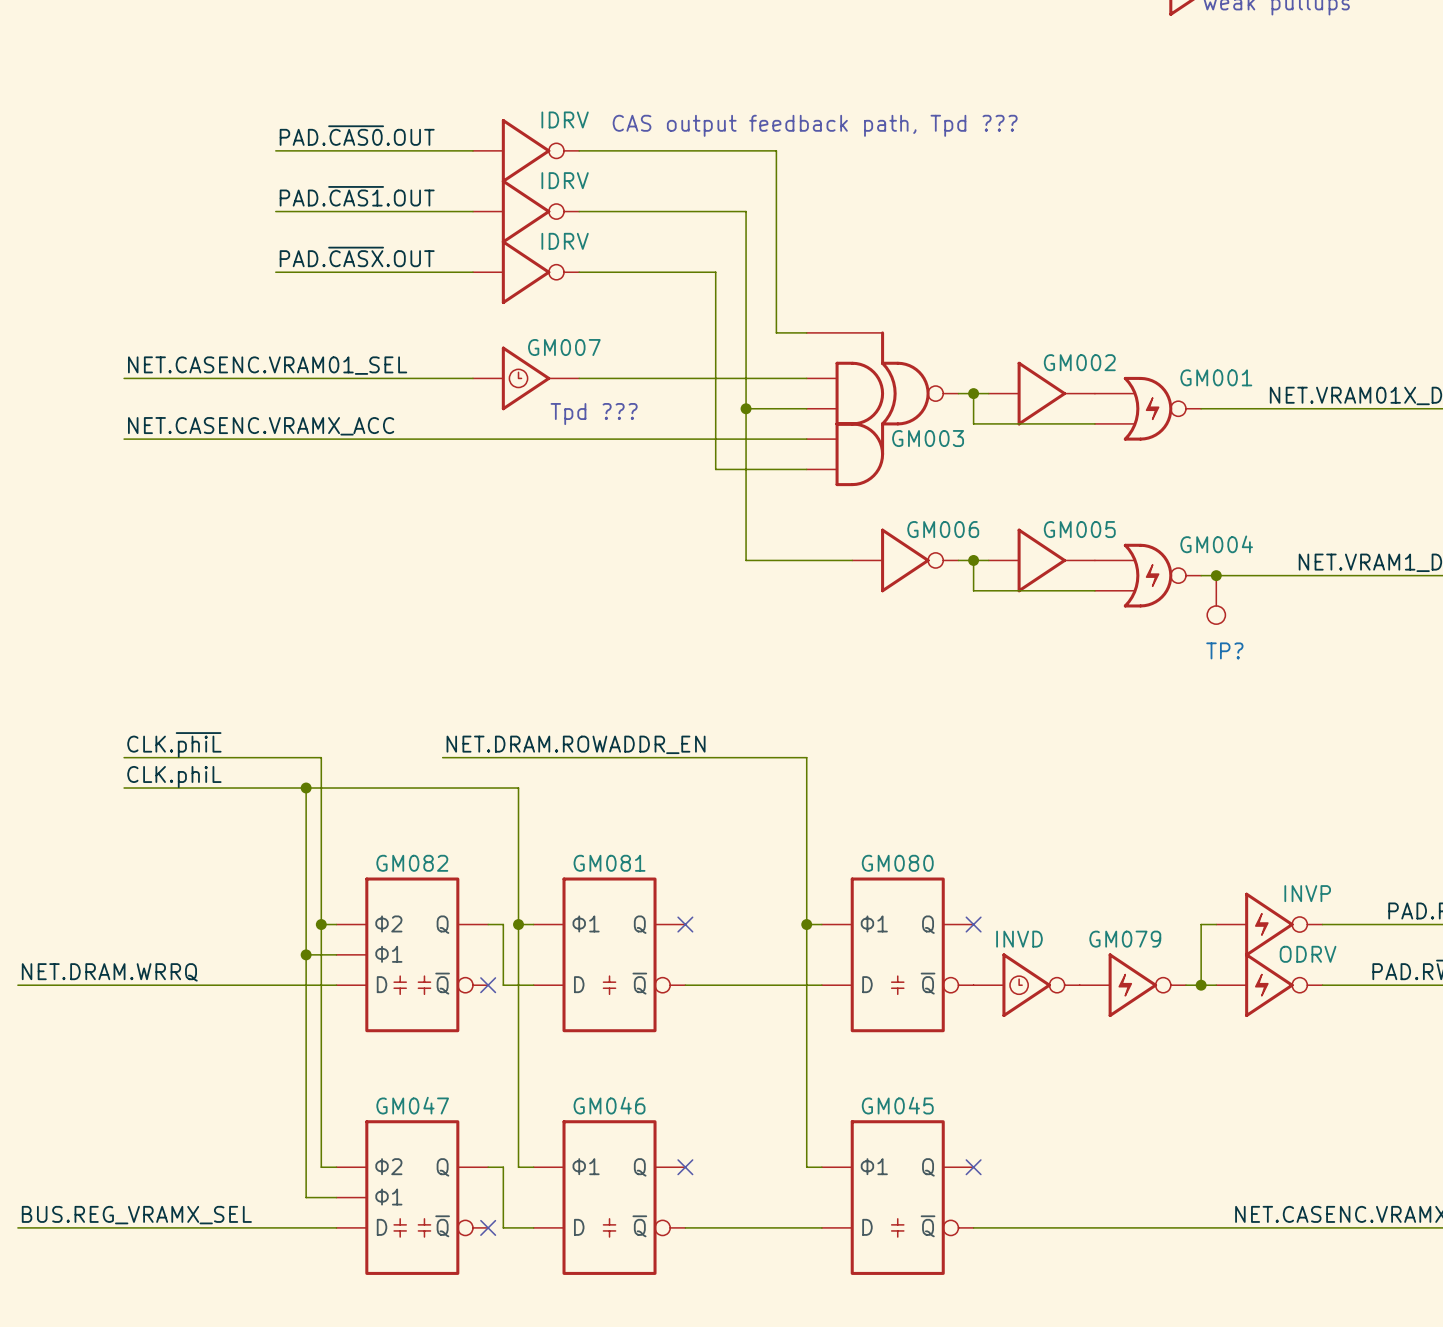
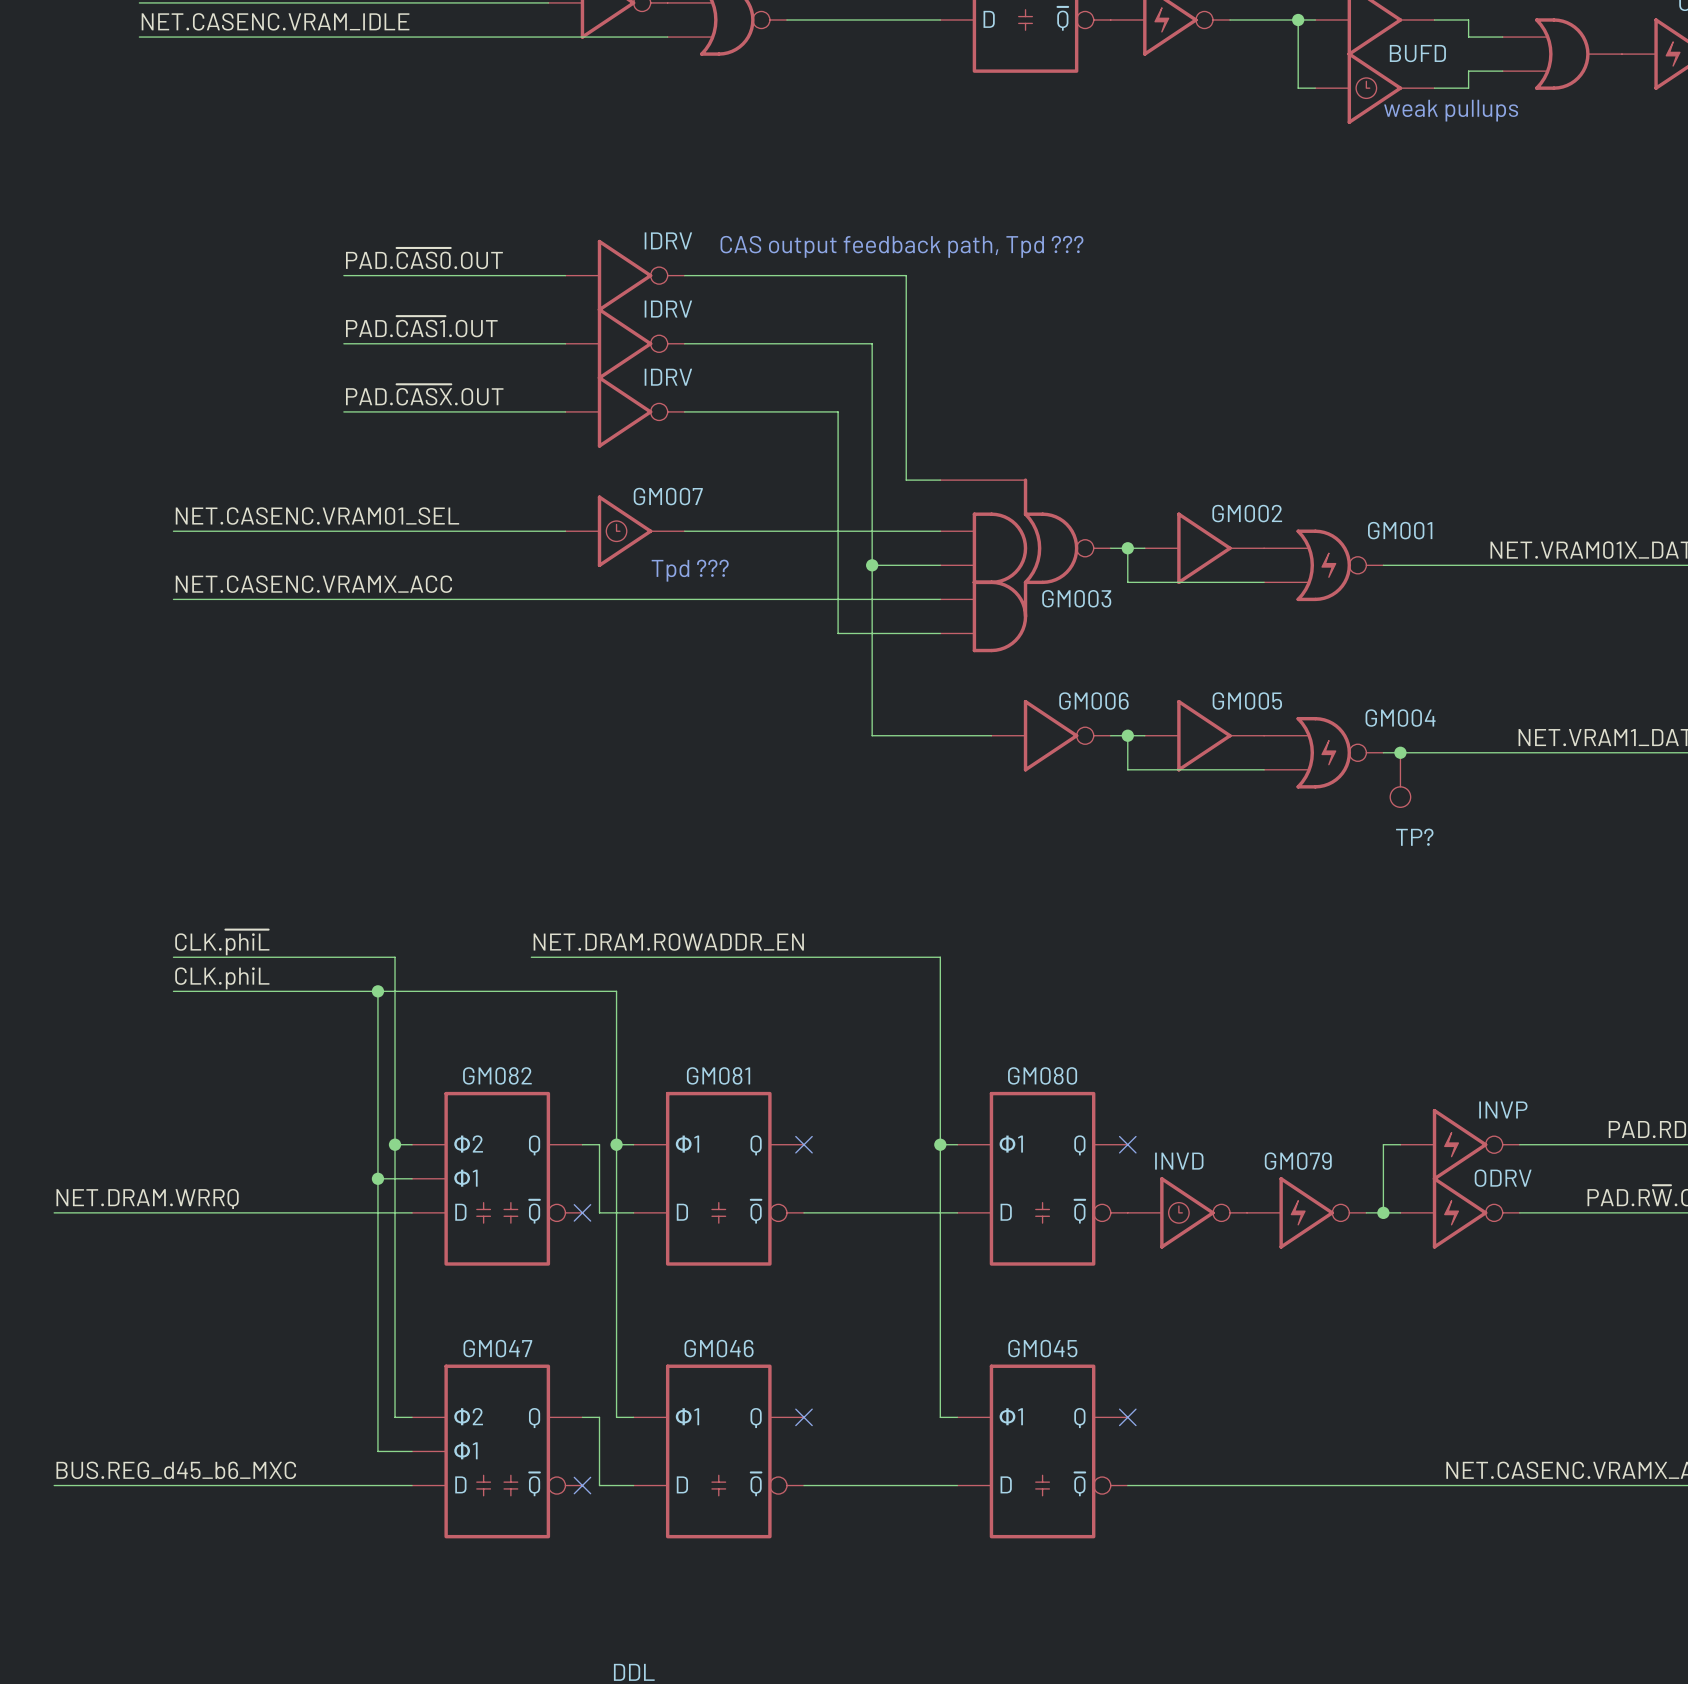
label: BUS.REG_VRAMX_SEL (136, 1215) -> BUS.REG_d45_b6_MXC (176, 1470)

